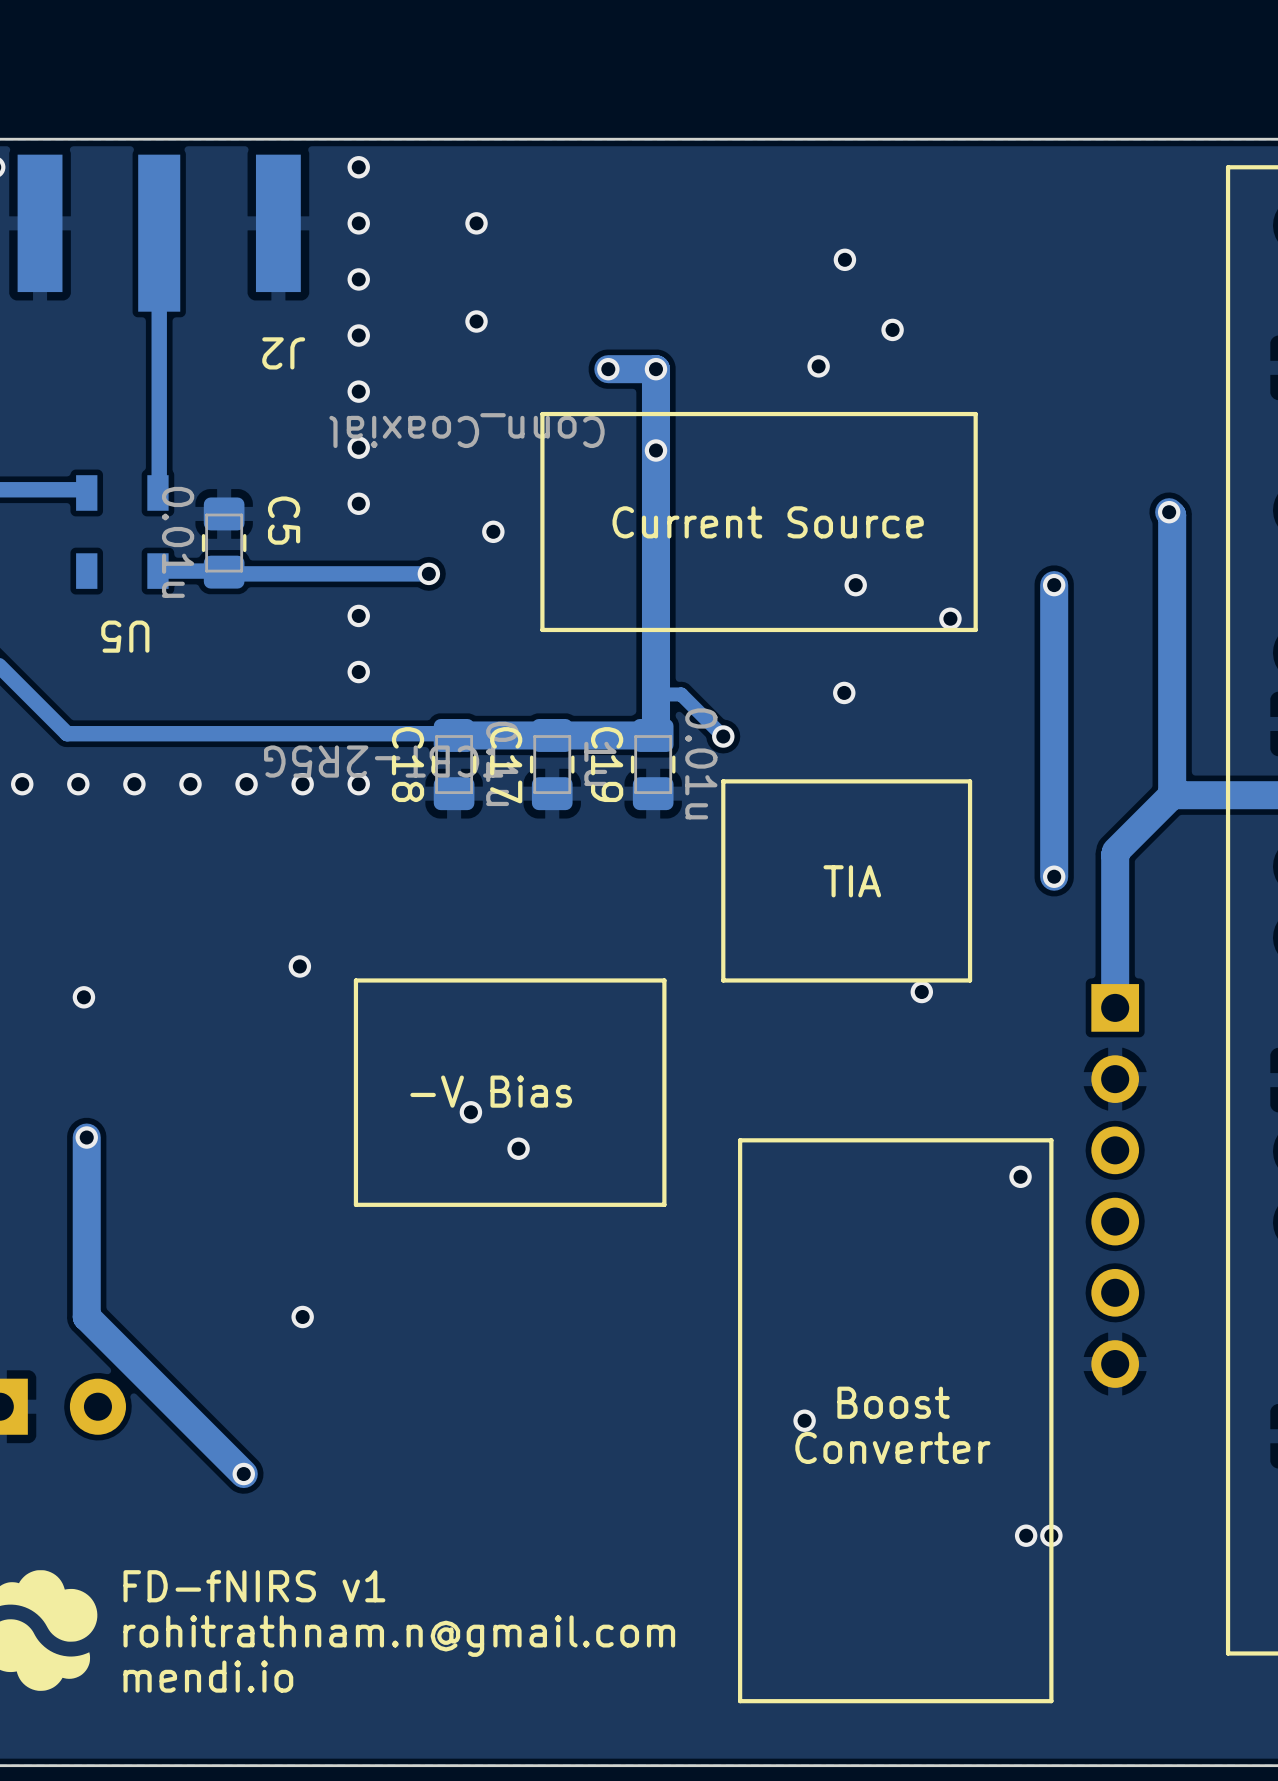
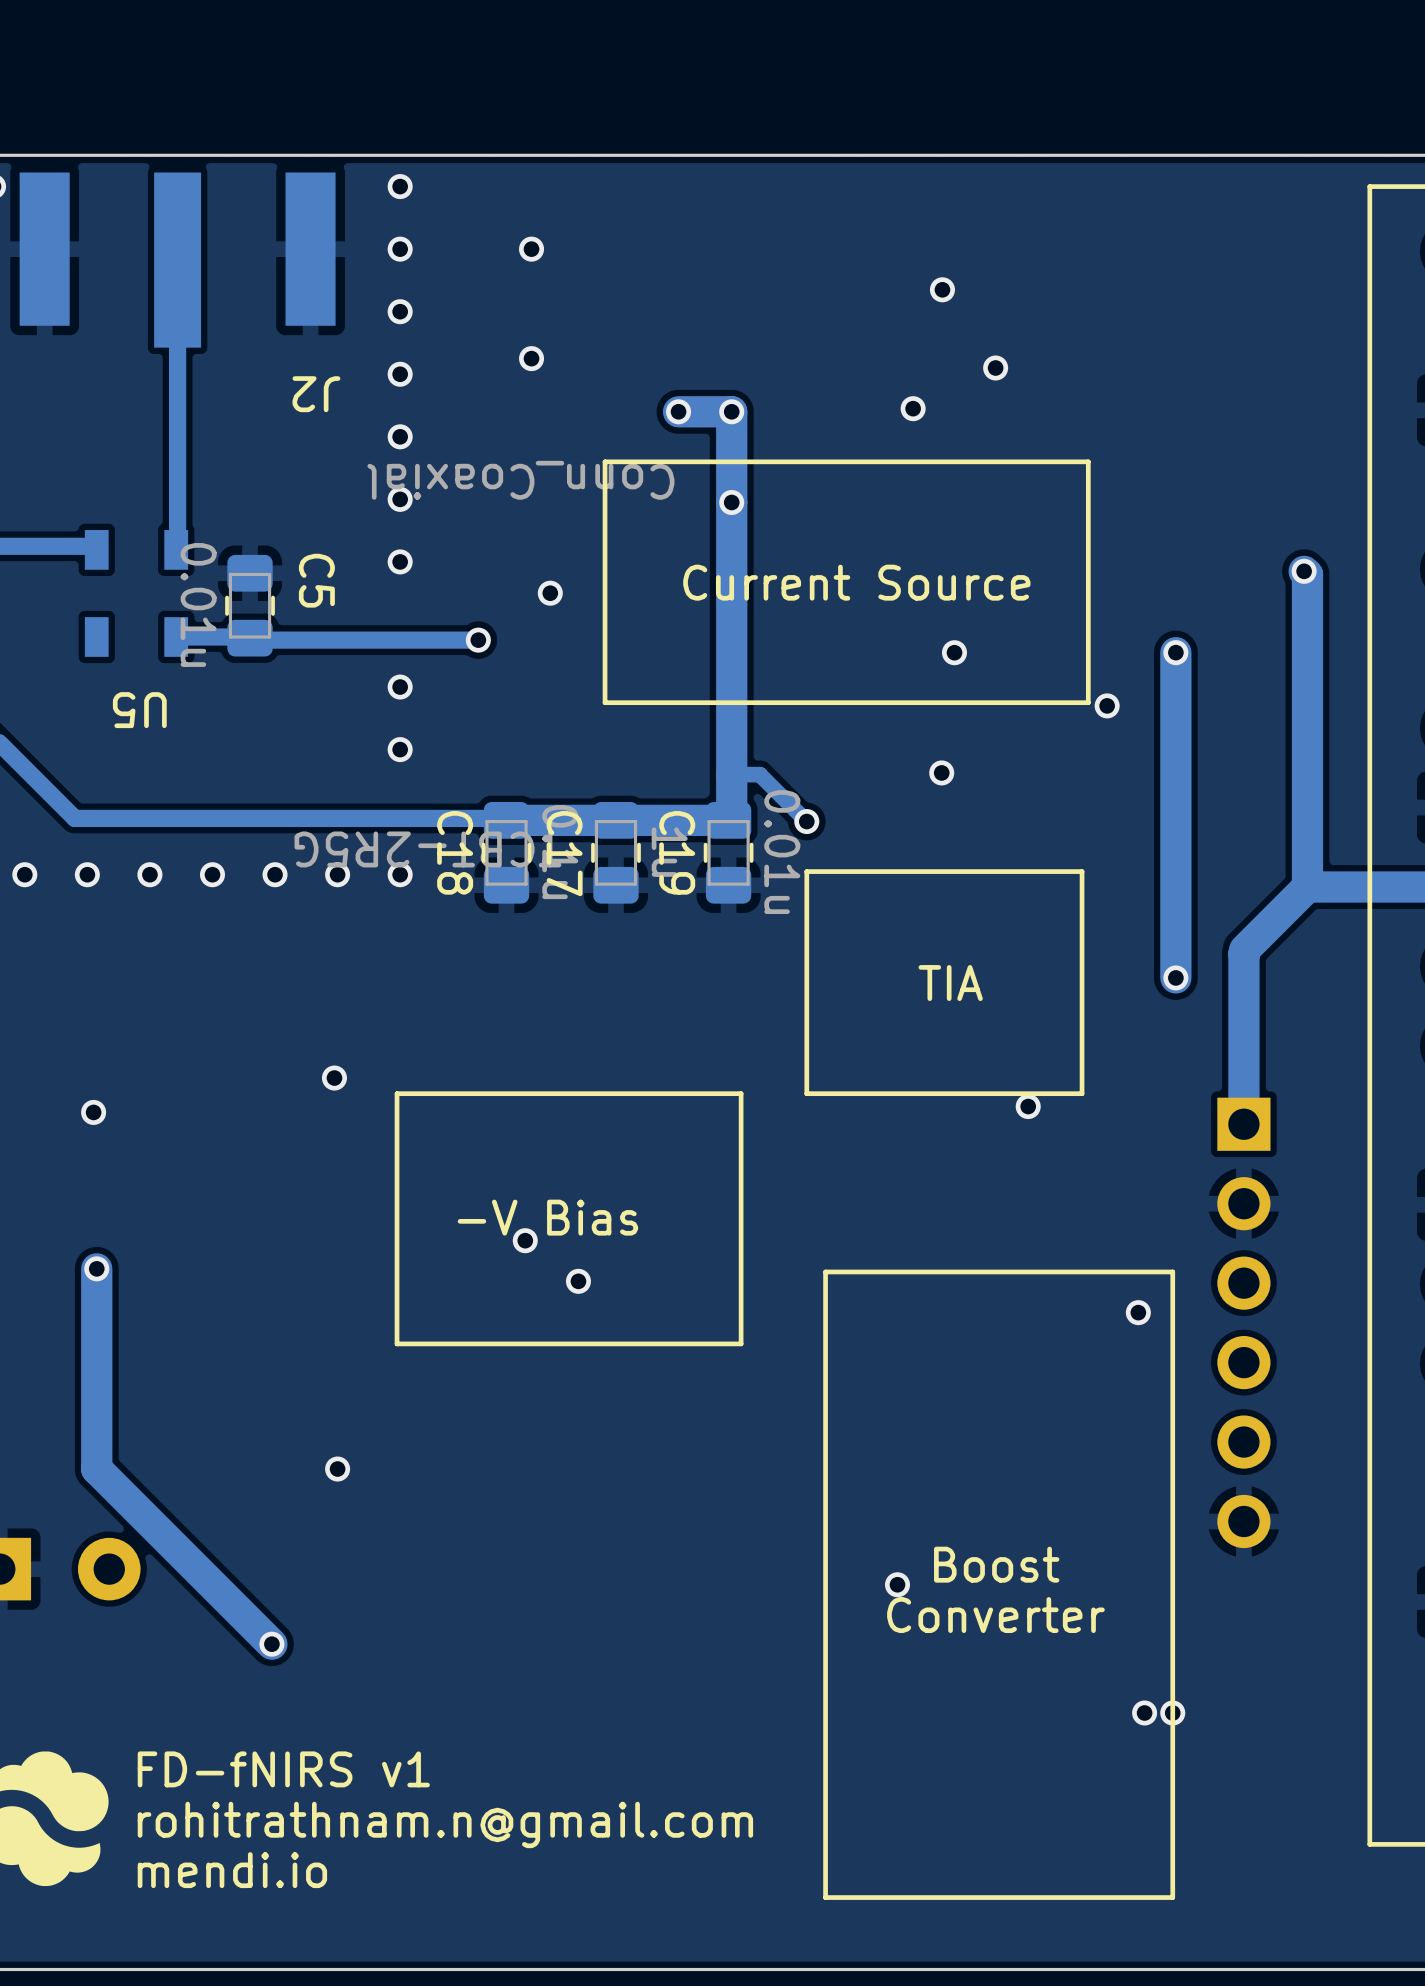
via position: (950, 618) -> (1107, 705)

